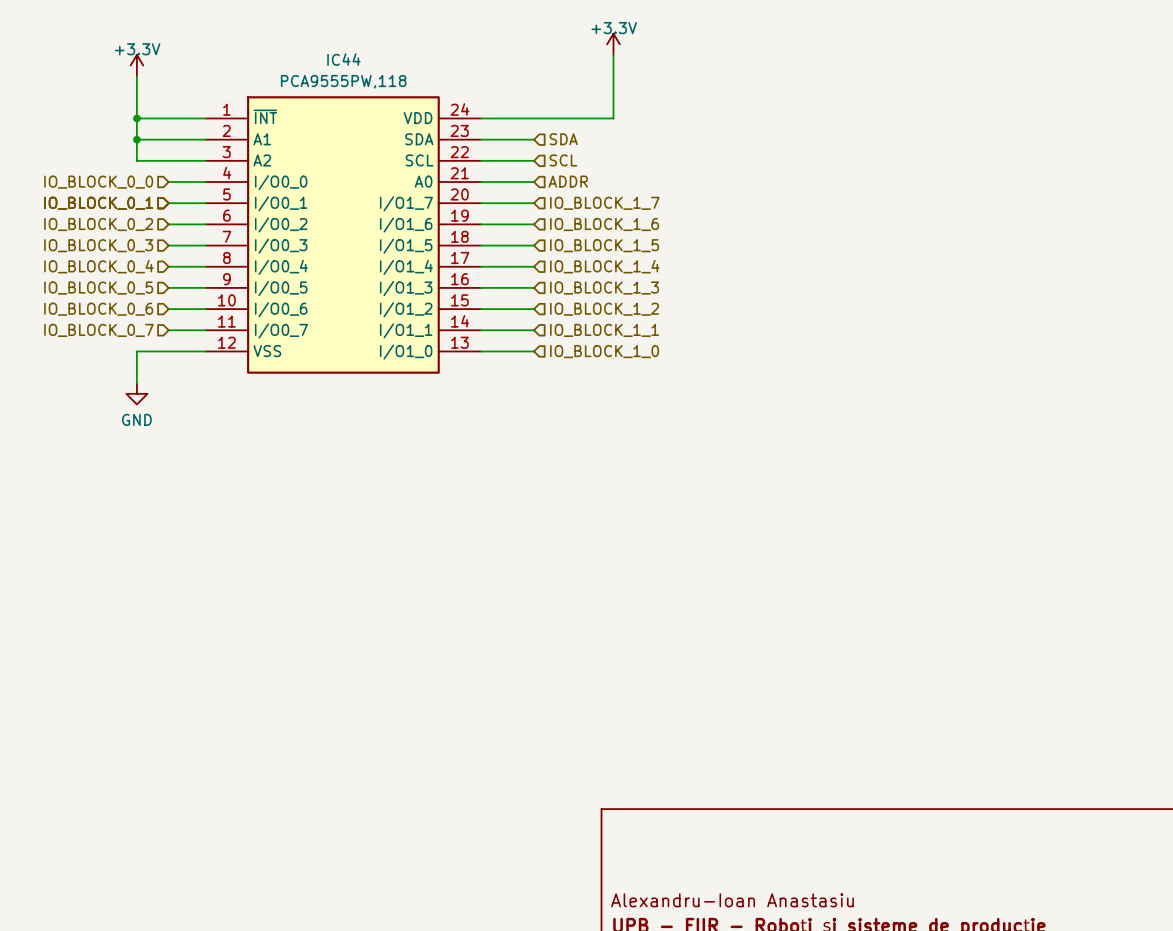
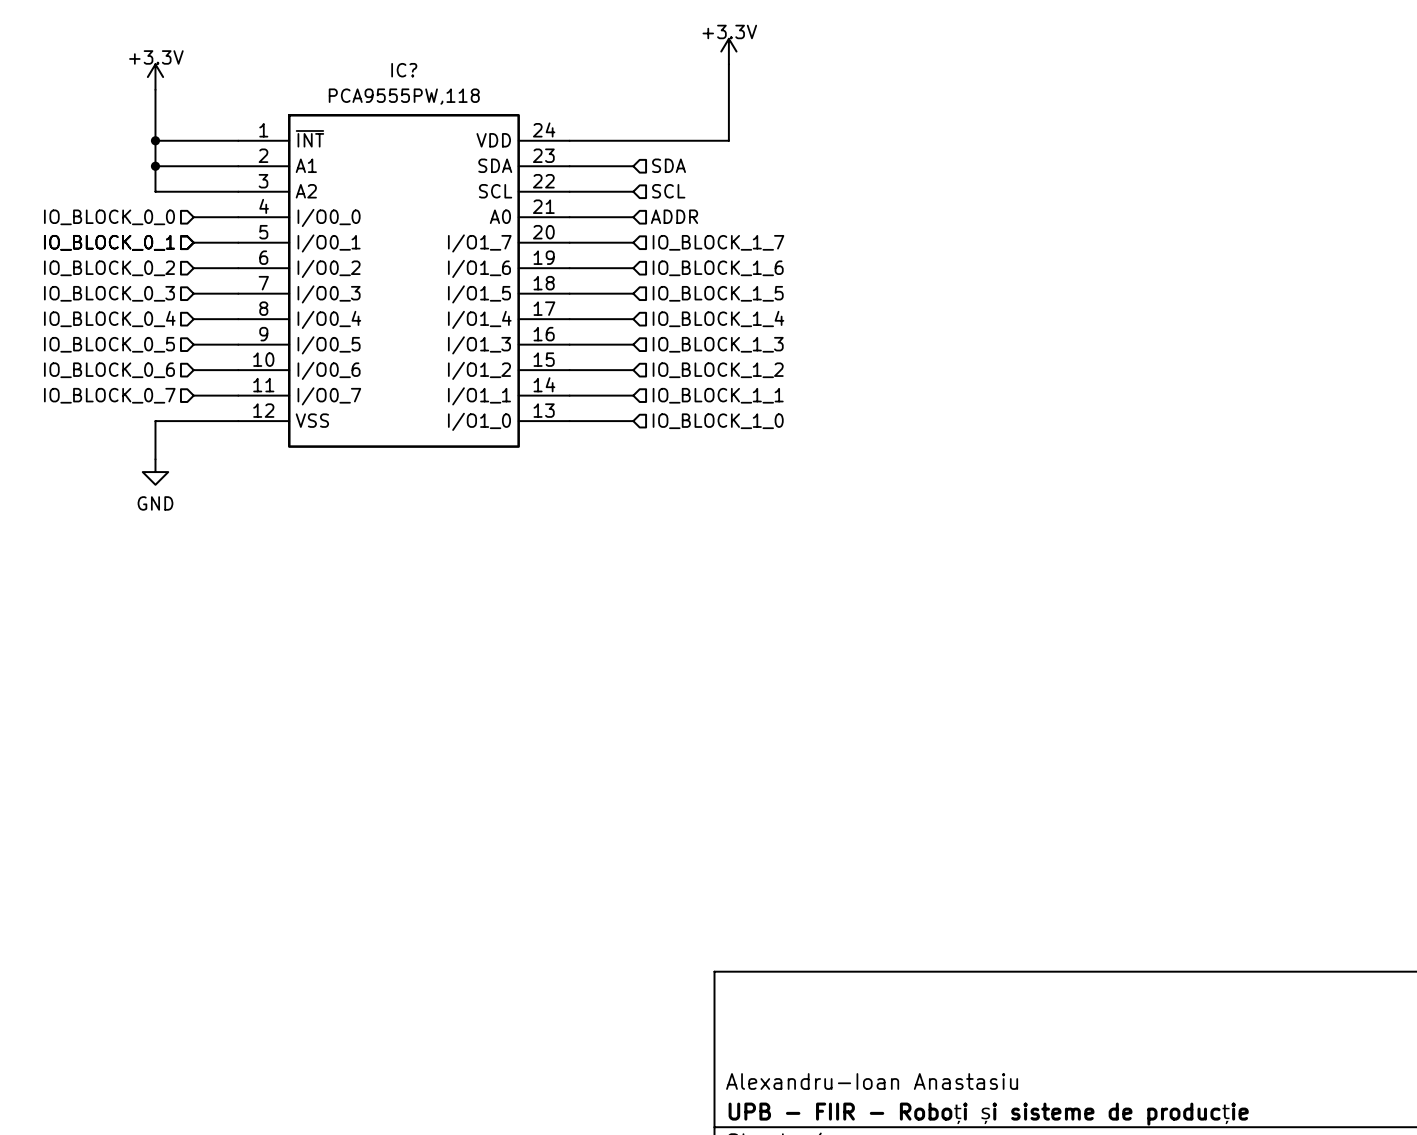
IC44 name: IC44 (343, 59) -> IC? (404, 70)

